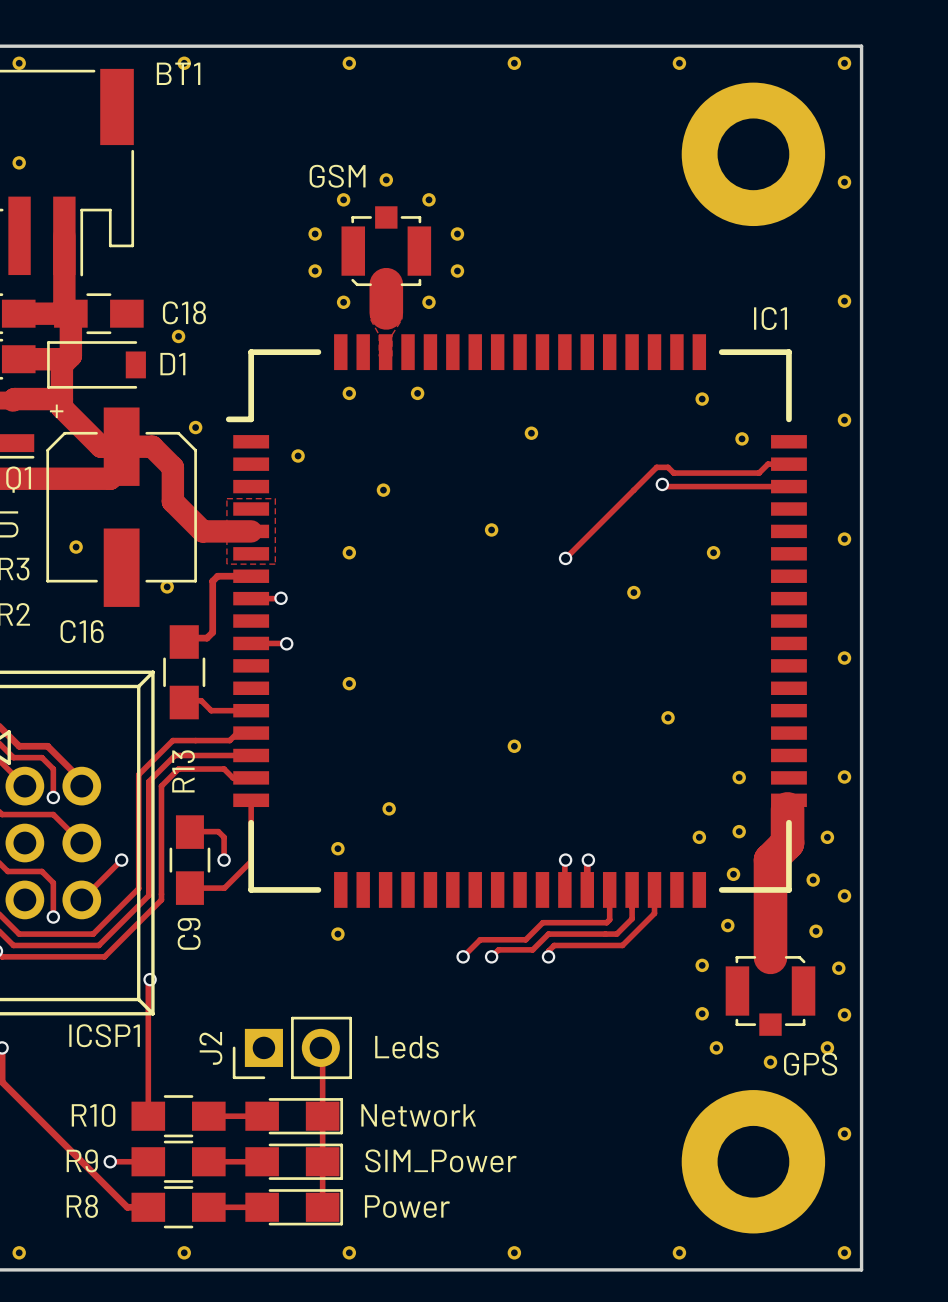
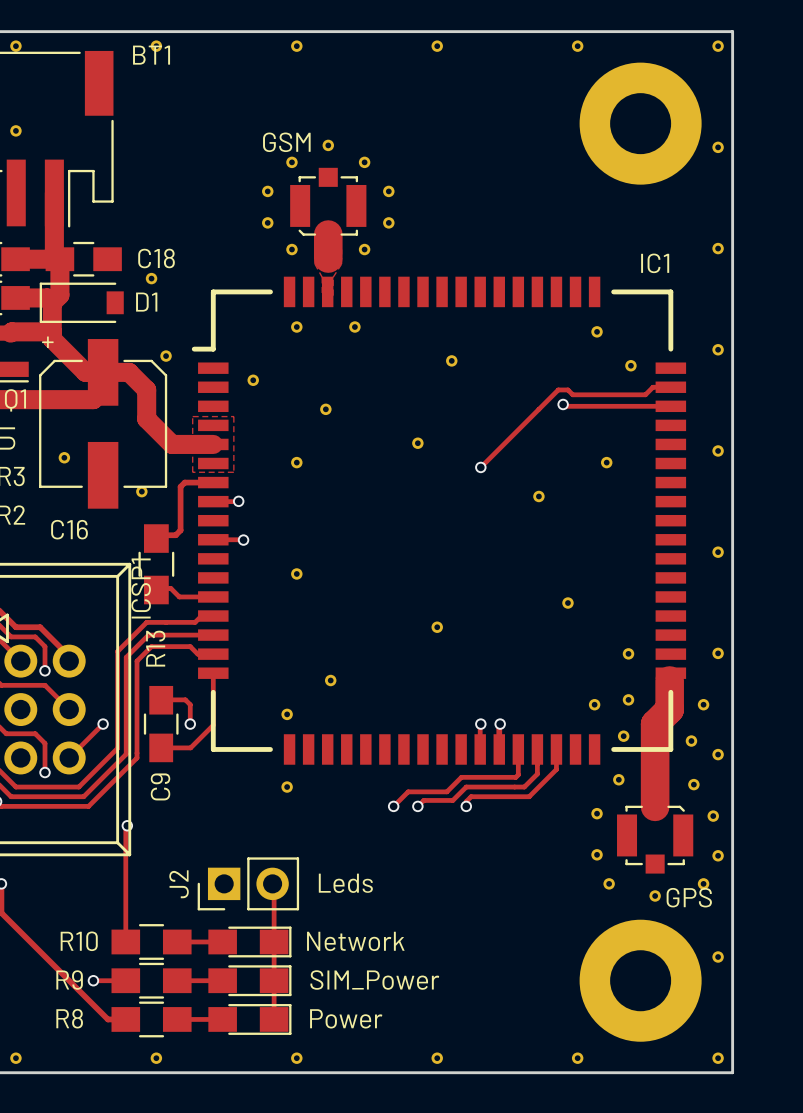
ICSP1 name rotation: 0° (104, 1035) -> 90° counterclockwise (141, 588)
ICSP1 name position: ICSP1 (104, 1035) -> ICSP1 (141, 588)

